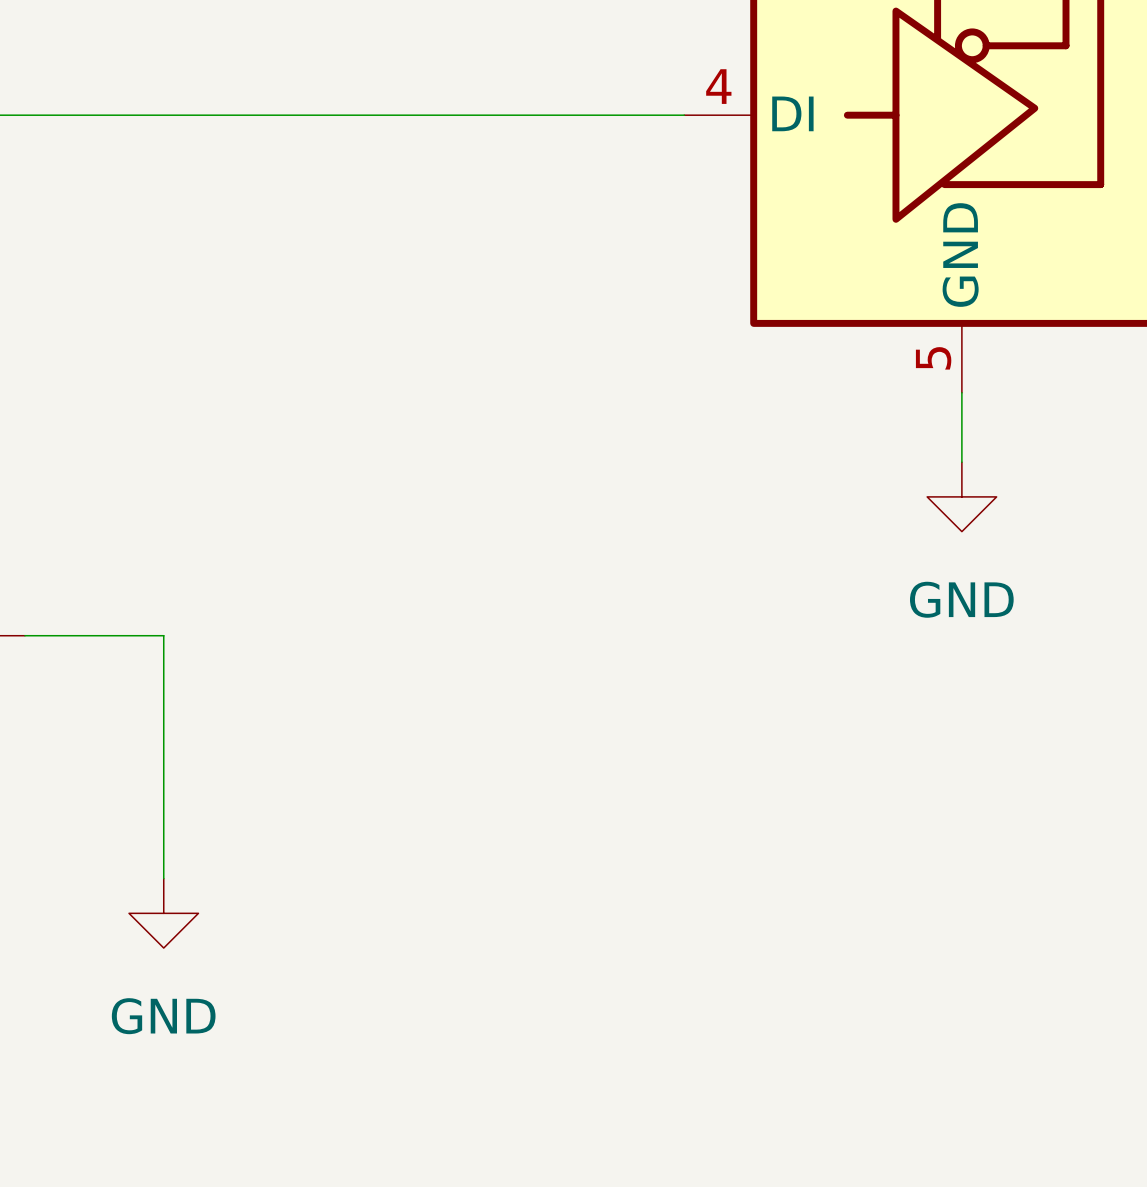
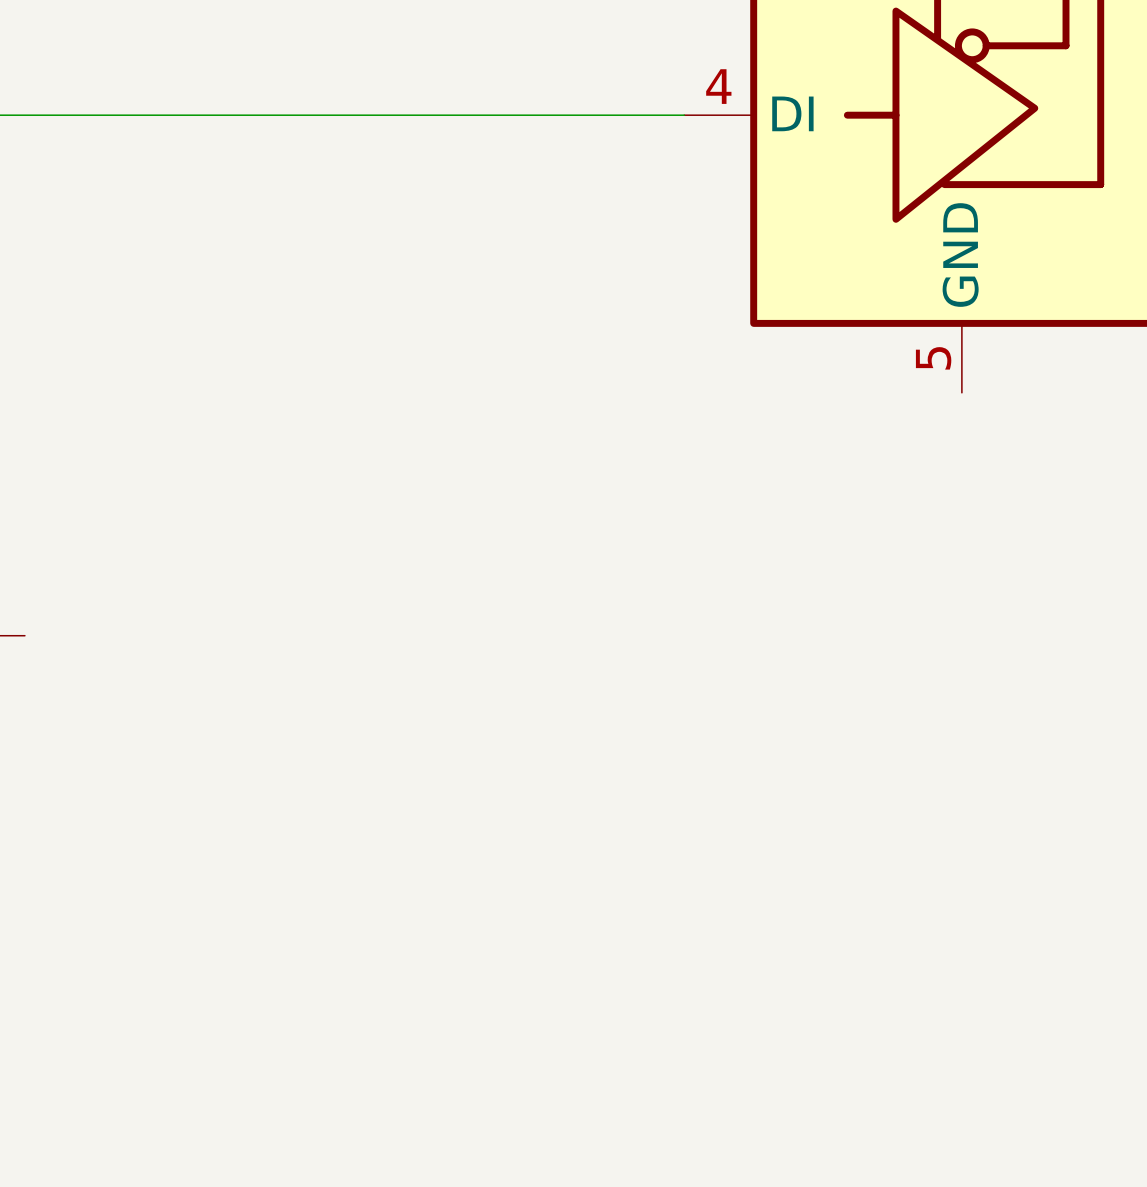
wire: (961, 392) (961, 462) -> none
power symbol: GND (961, 496) -> none
wire: (24, 635) (163, 635) (163, 878) -> none
power symbol: GND (163, 913) -> none

